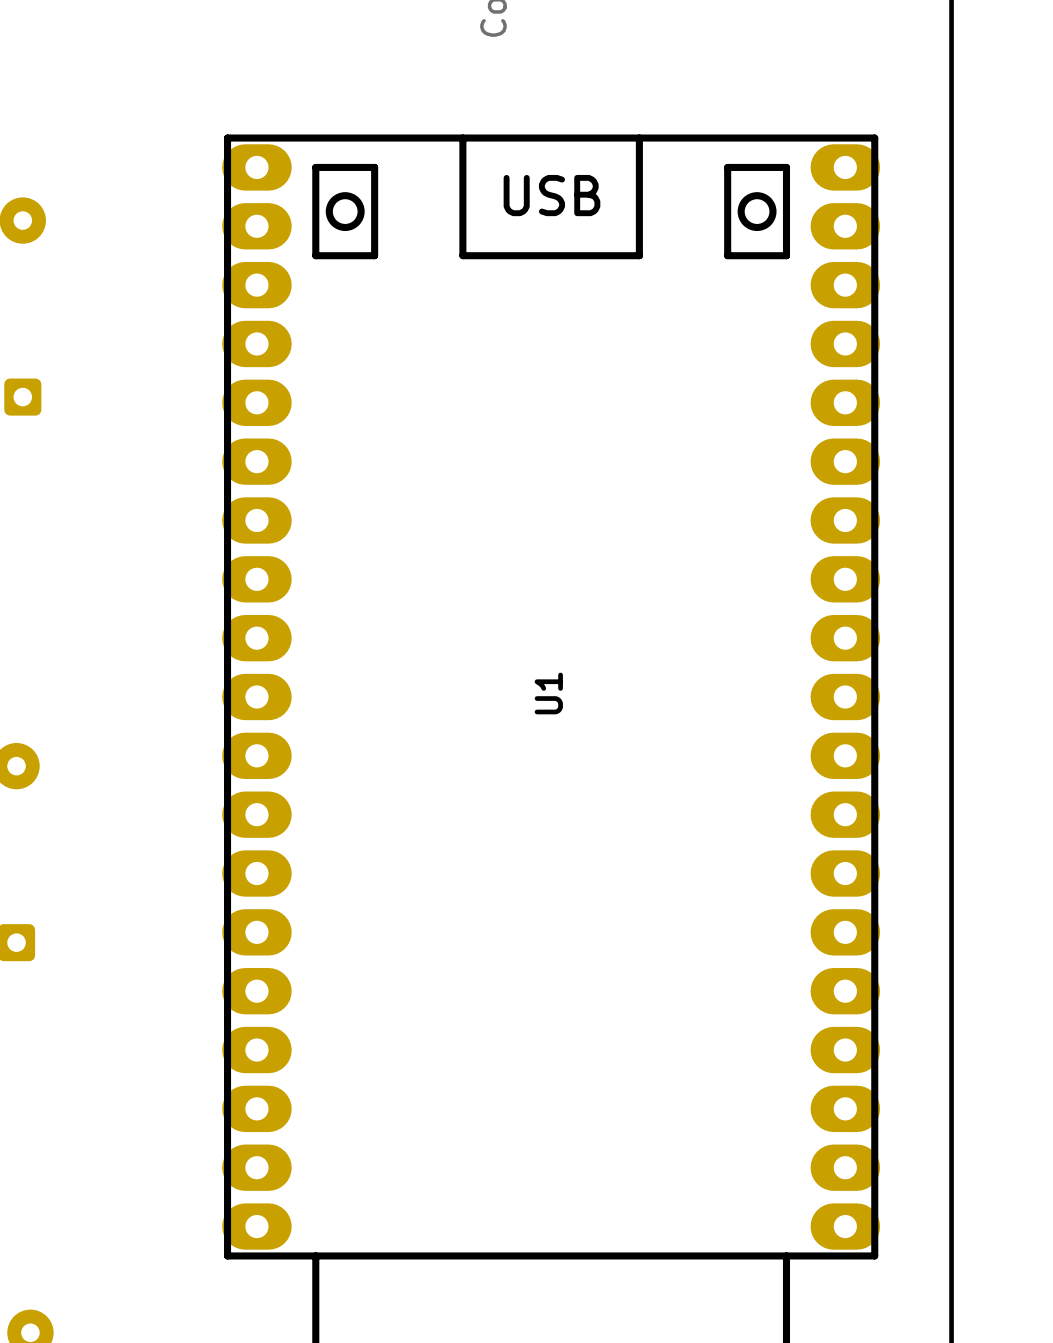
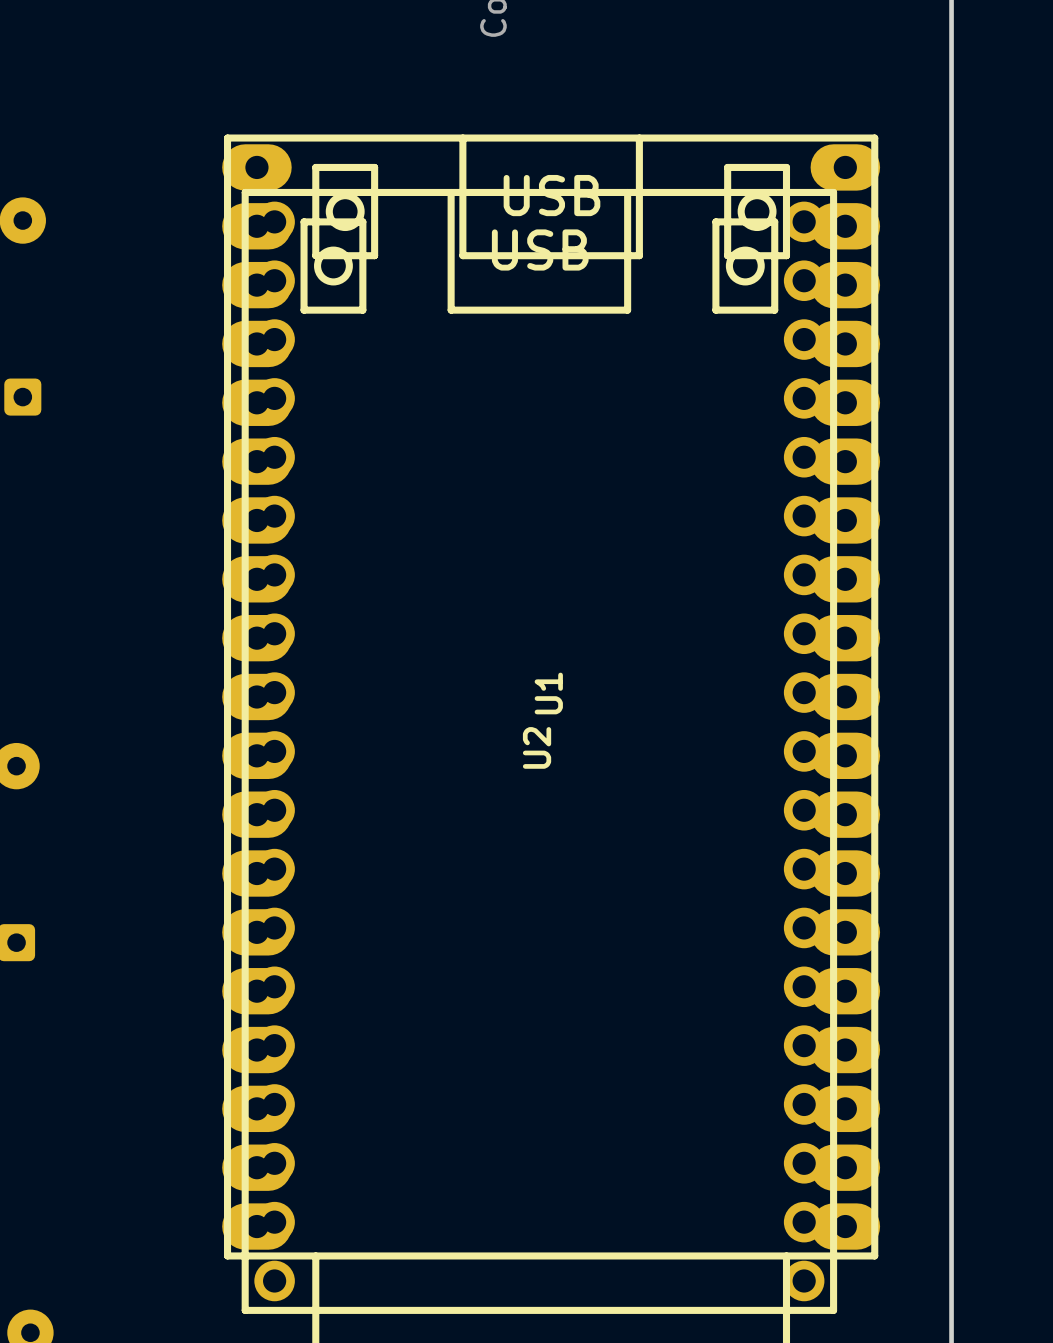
U2: none -> (539, 751)

